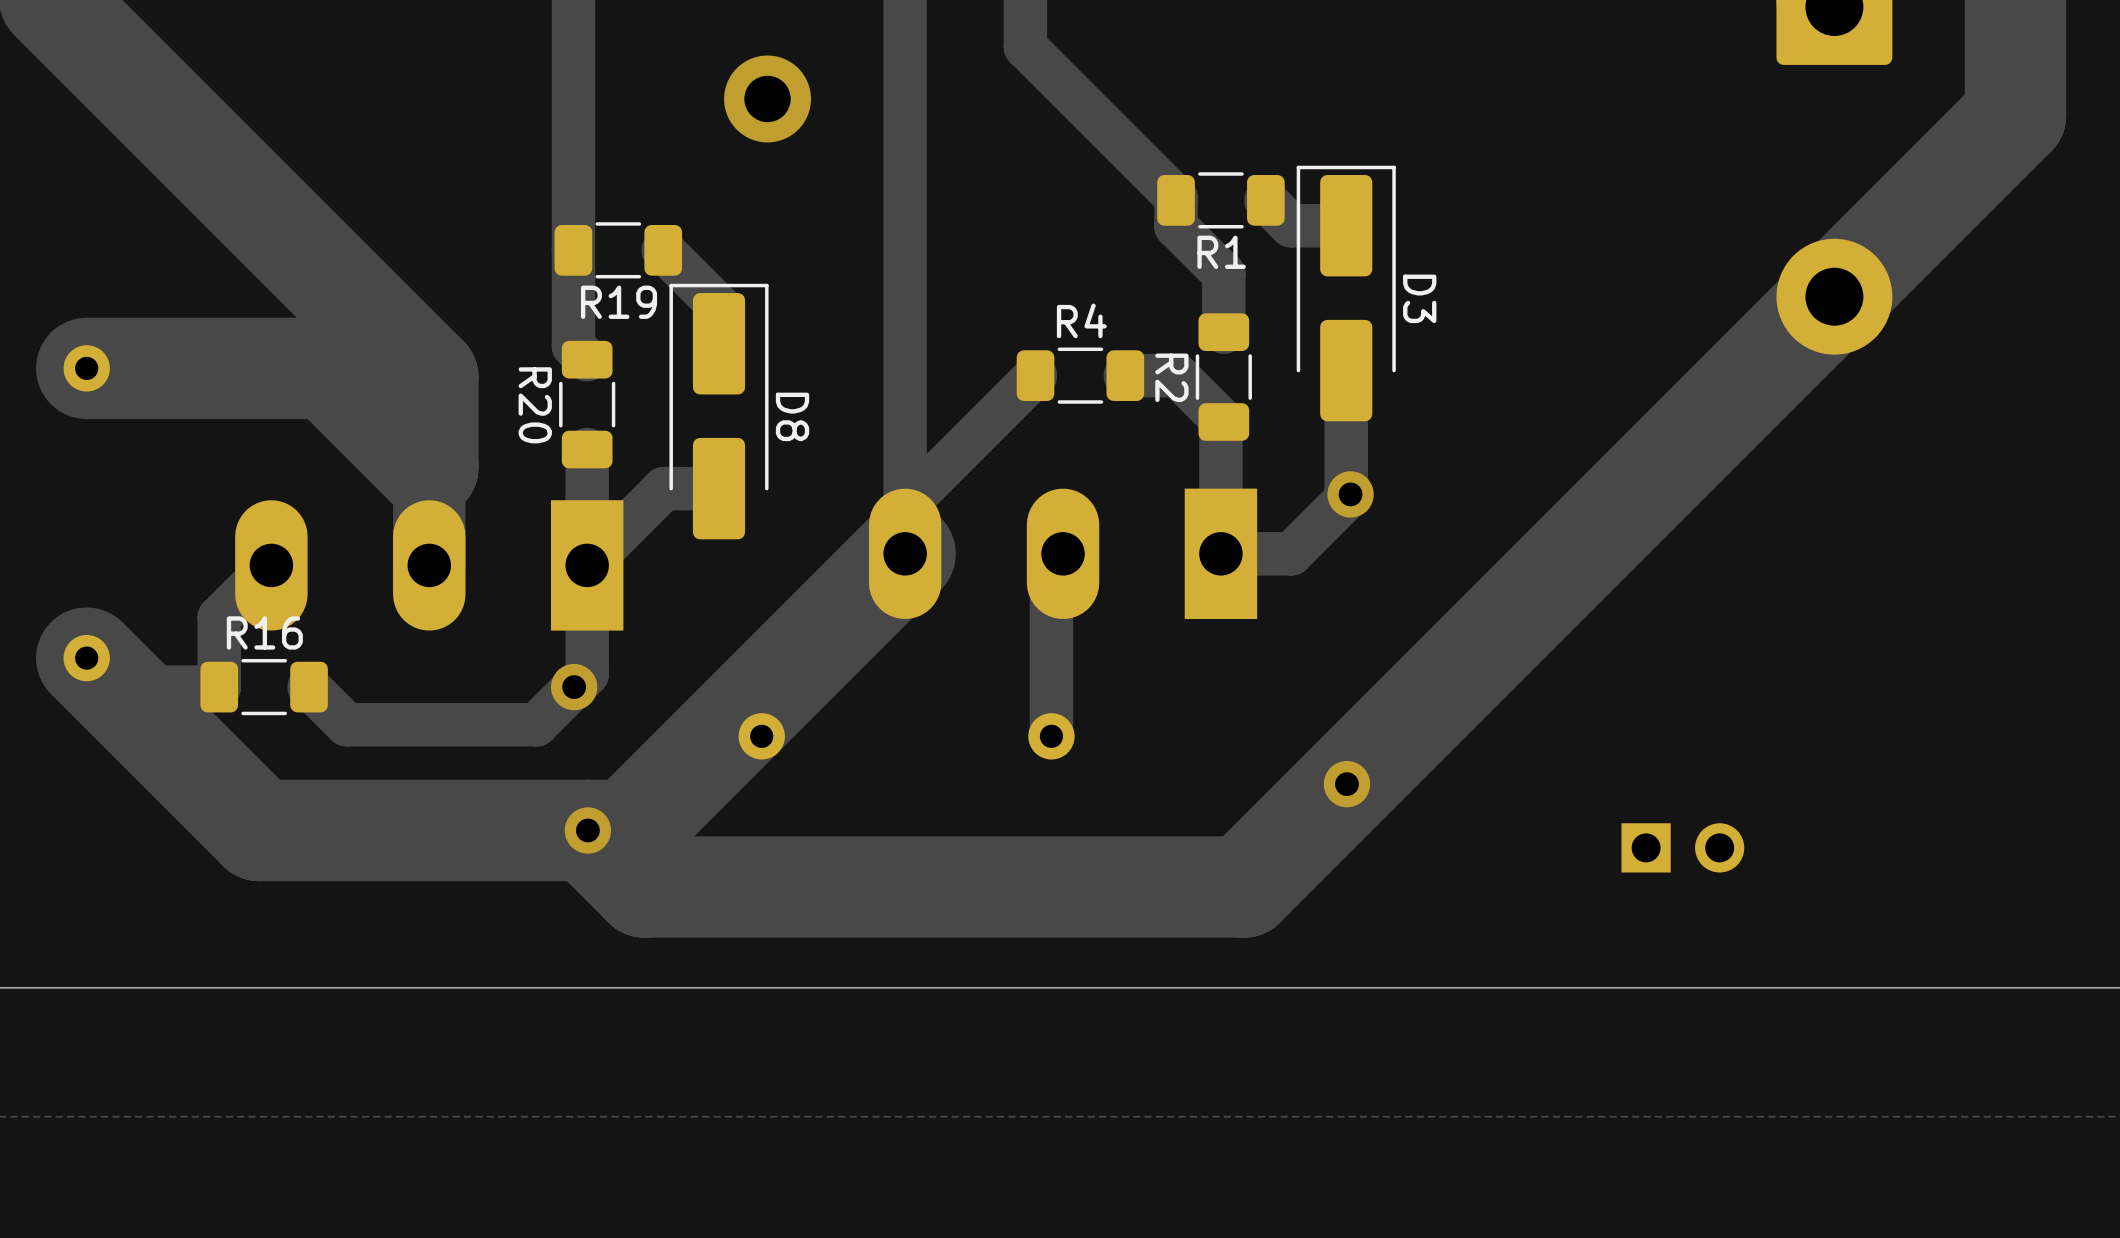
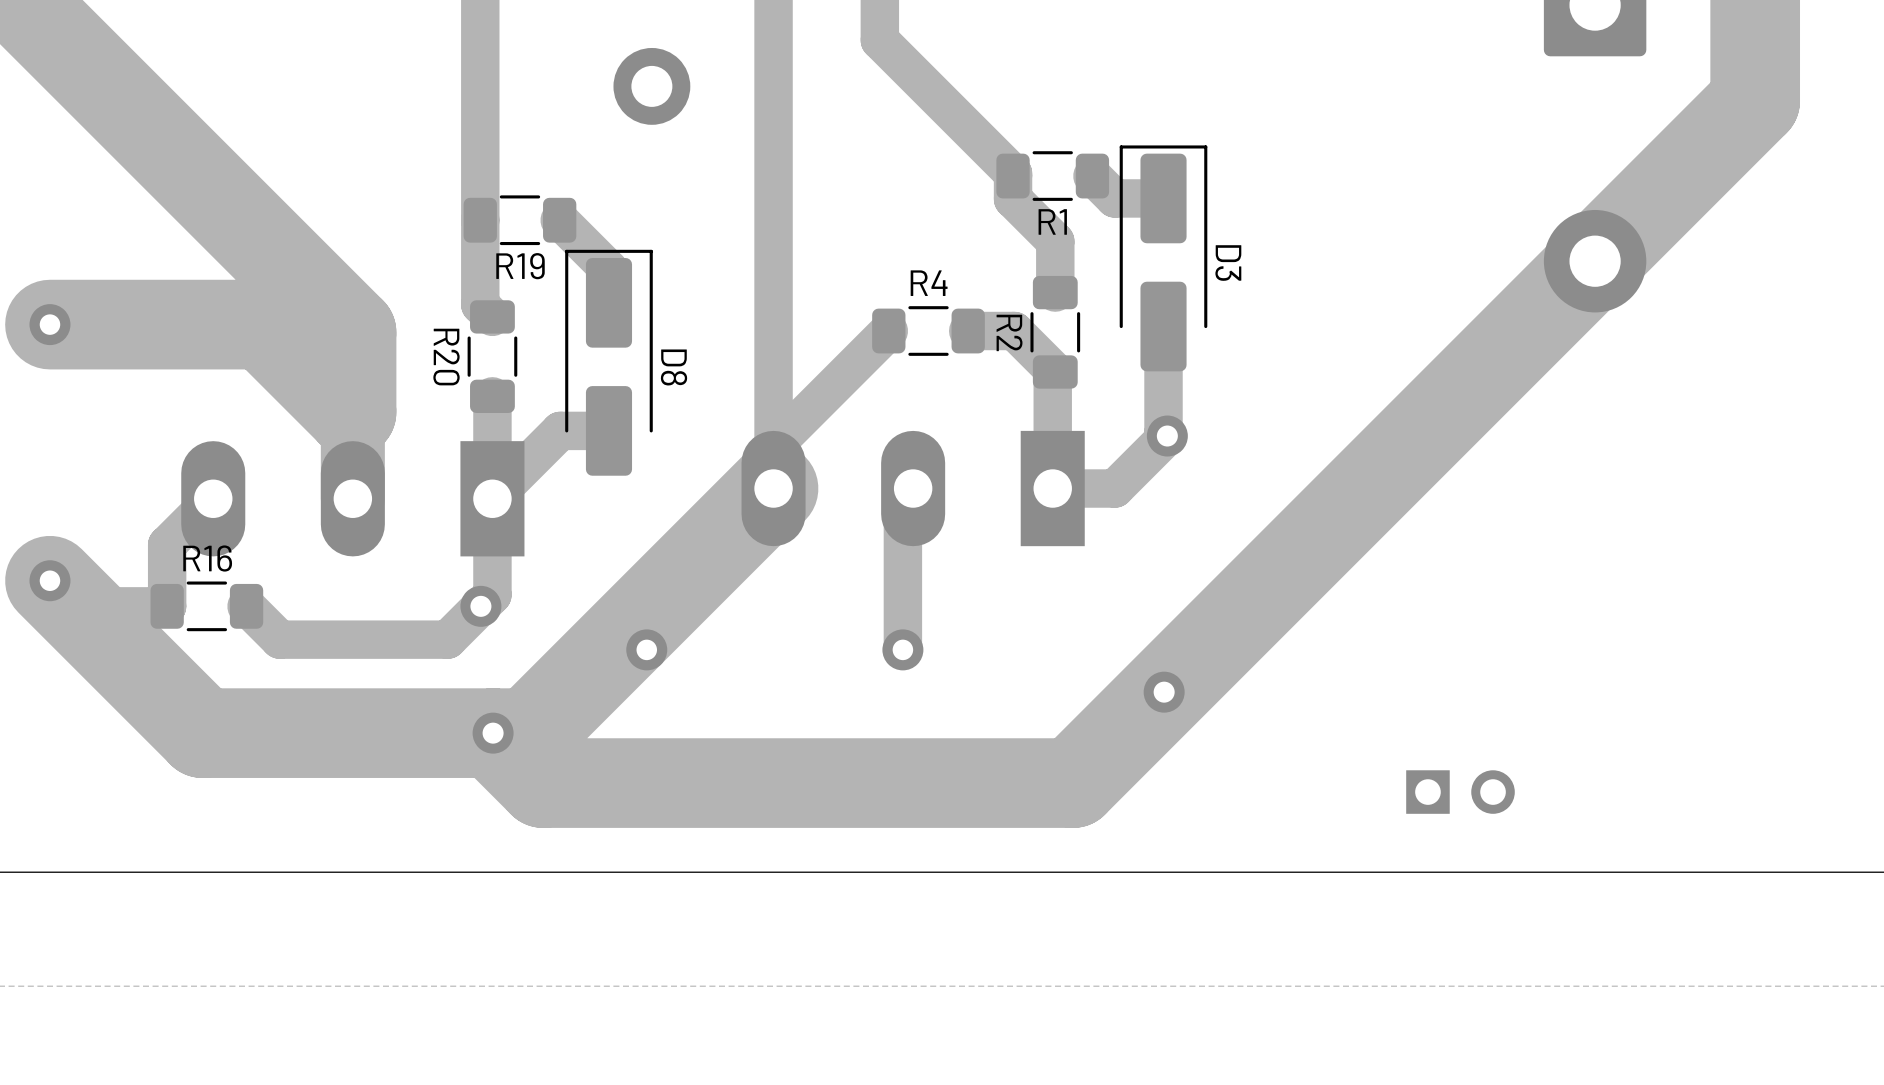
part position: (1682, 847) -> (1460, 792)

